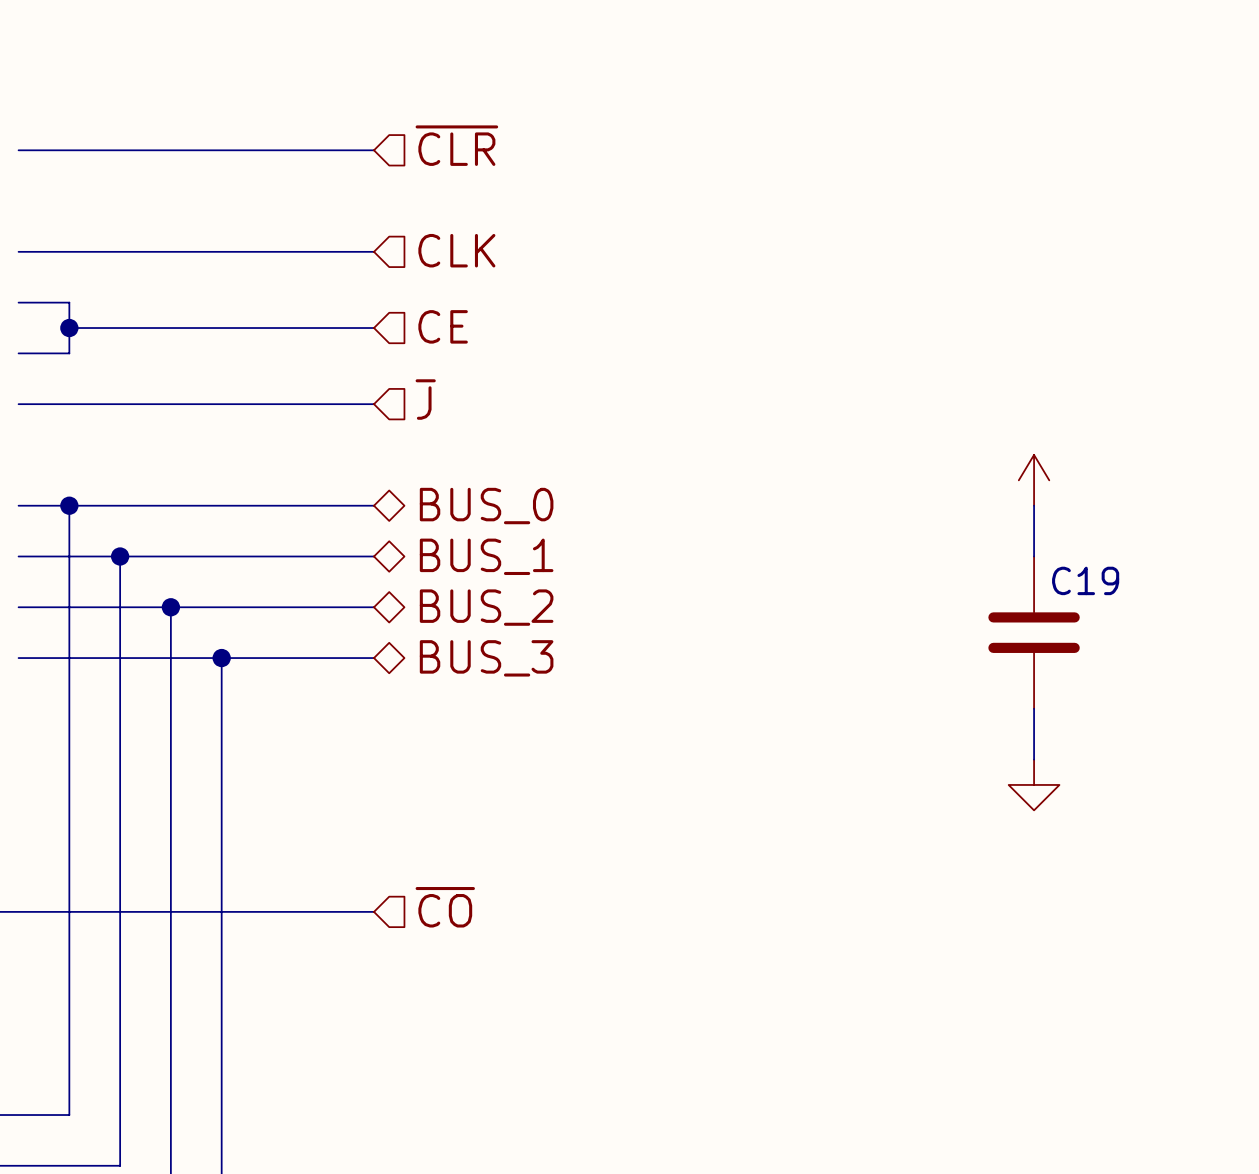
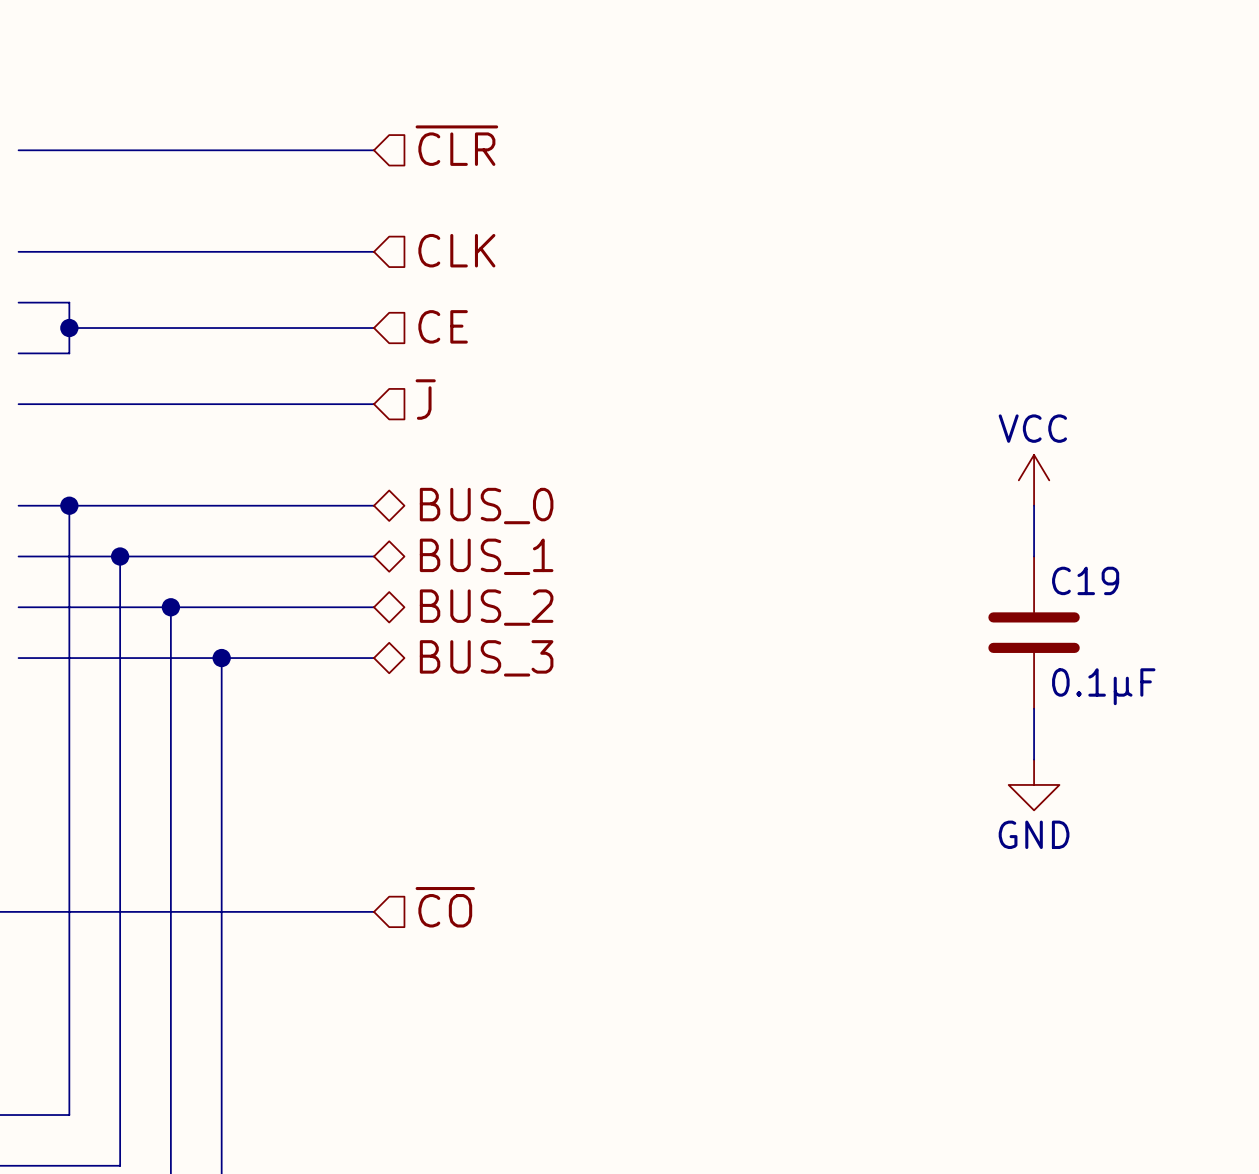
power symbol text: none -> VCC (1032, 428)
C19 value: none -> 0.1µF (1103, 686)
power symbol text: none -> GND (1034, 834)

